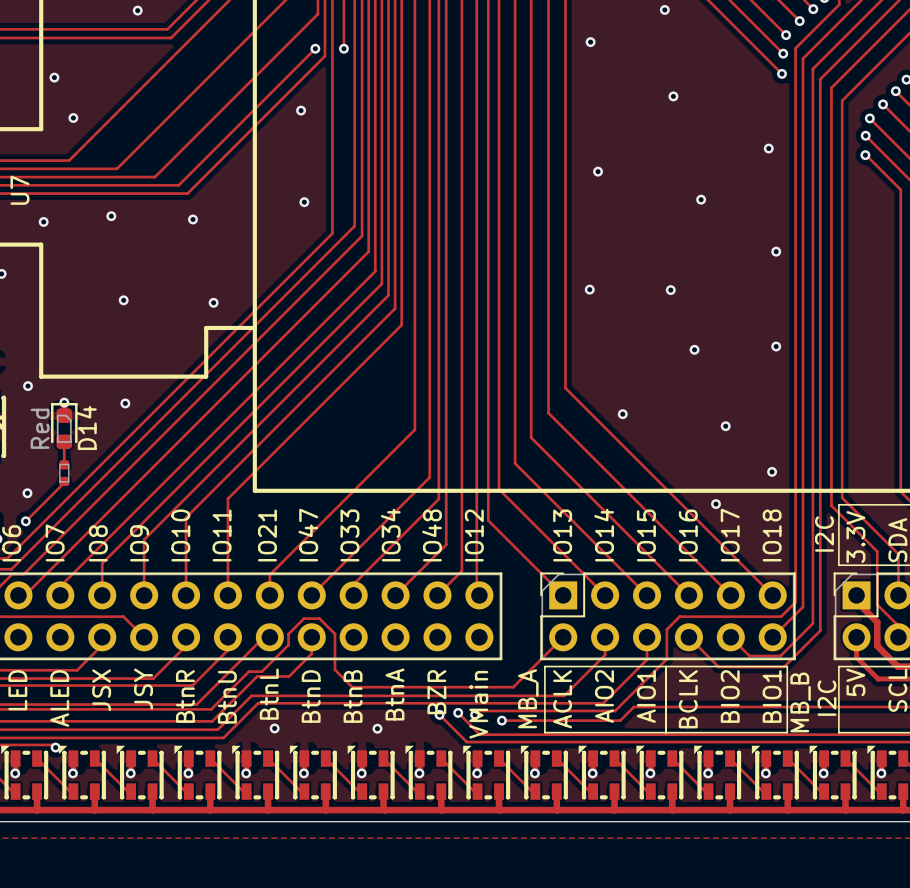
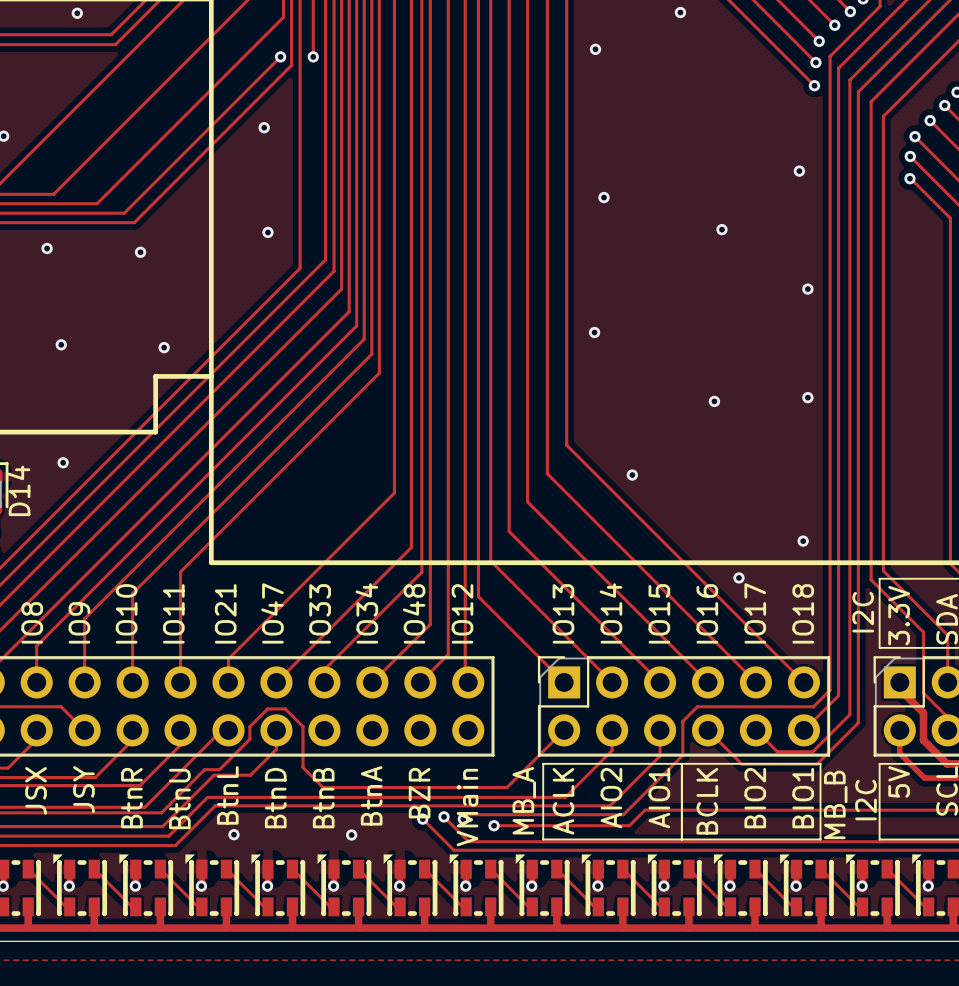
via: (673, 96) -> none
via: (670, 290) -> none
via: (725, 426) -> none

